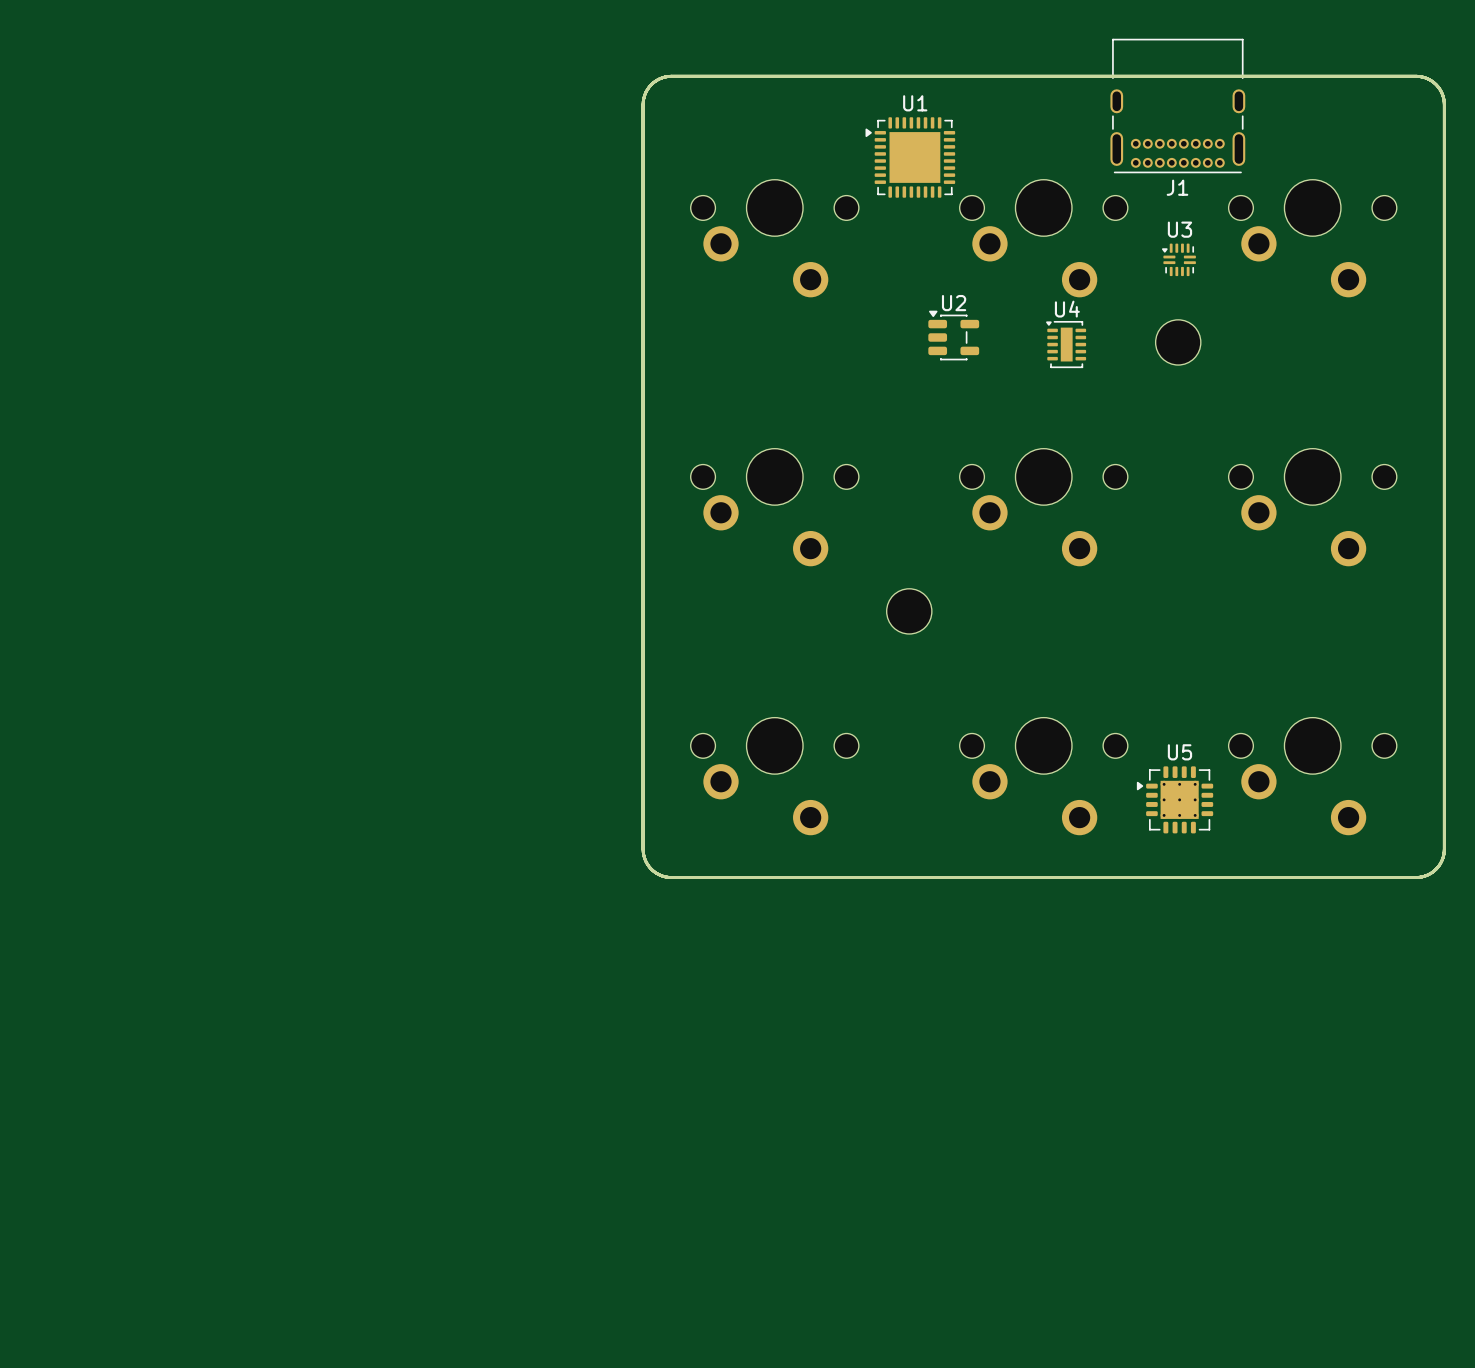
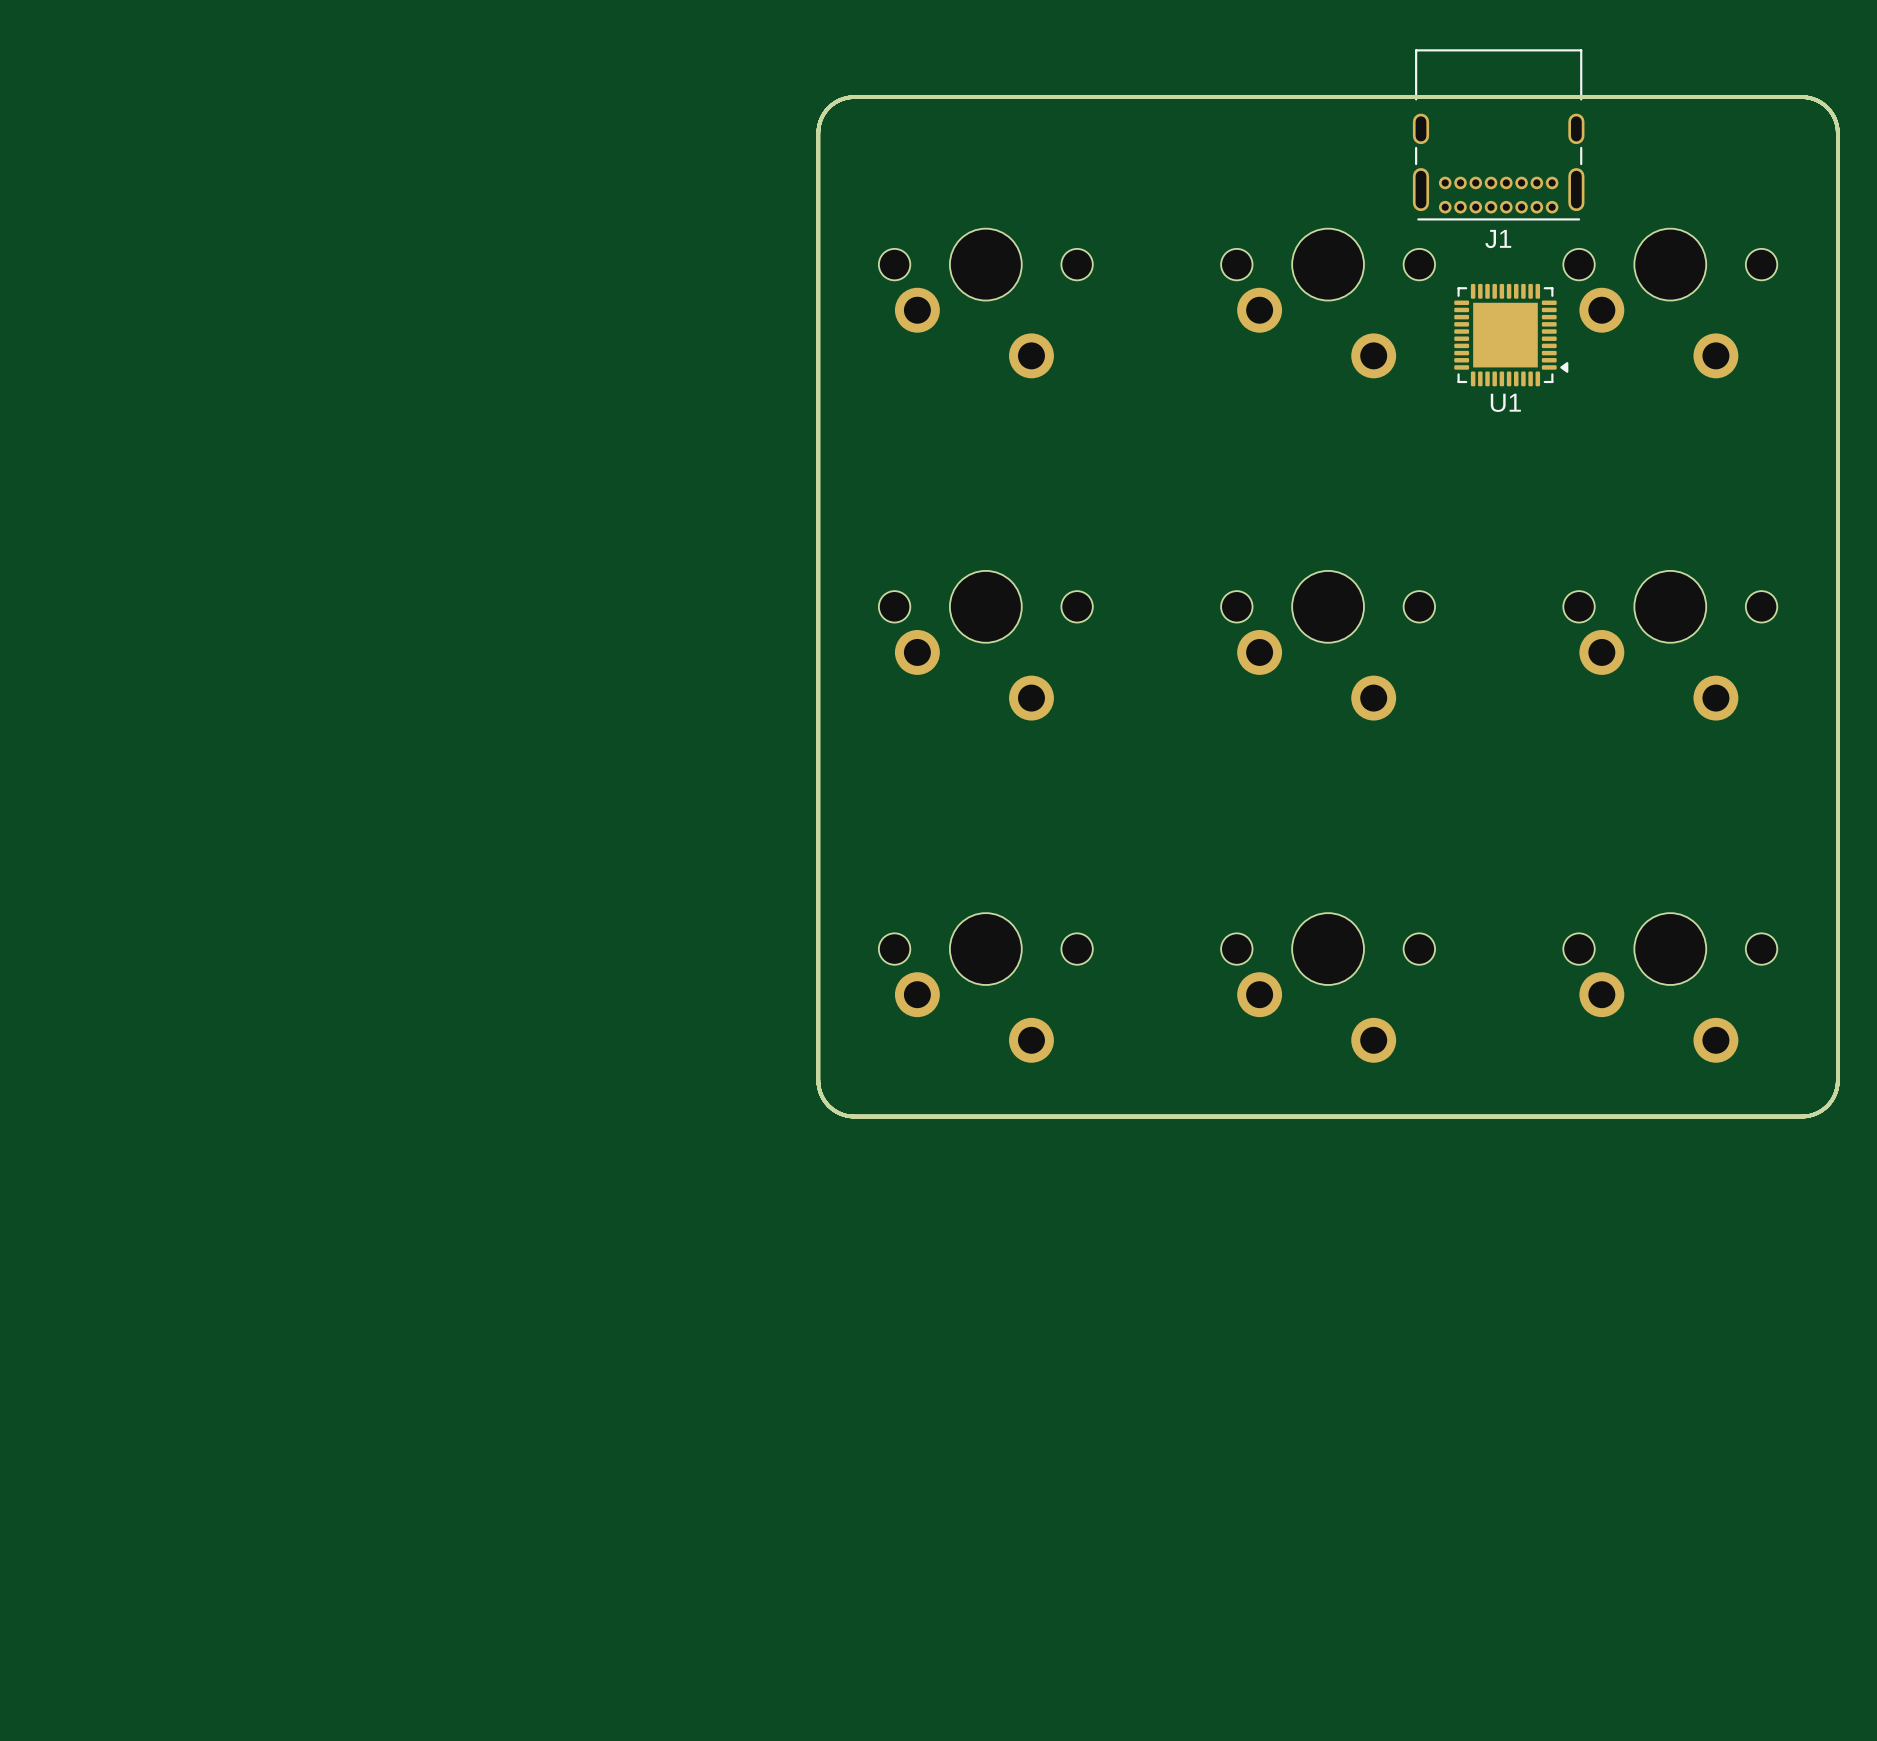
U1 name position: U1 (915, 103) -> U1 (1505, 402)
U1 footprint: [865, 117, 956, 198] -> [1454, 283, 1569, 387]
U3: (1178, 259) -> none
U2: (953, 335) -> none
part: (1178, 342) -> none
U4: (1066, 344) -> none
part: (909, 611) -> none
U5: (1175, 799) -> none

